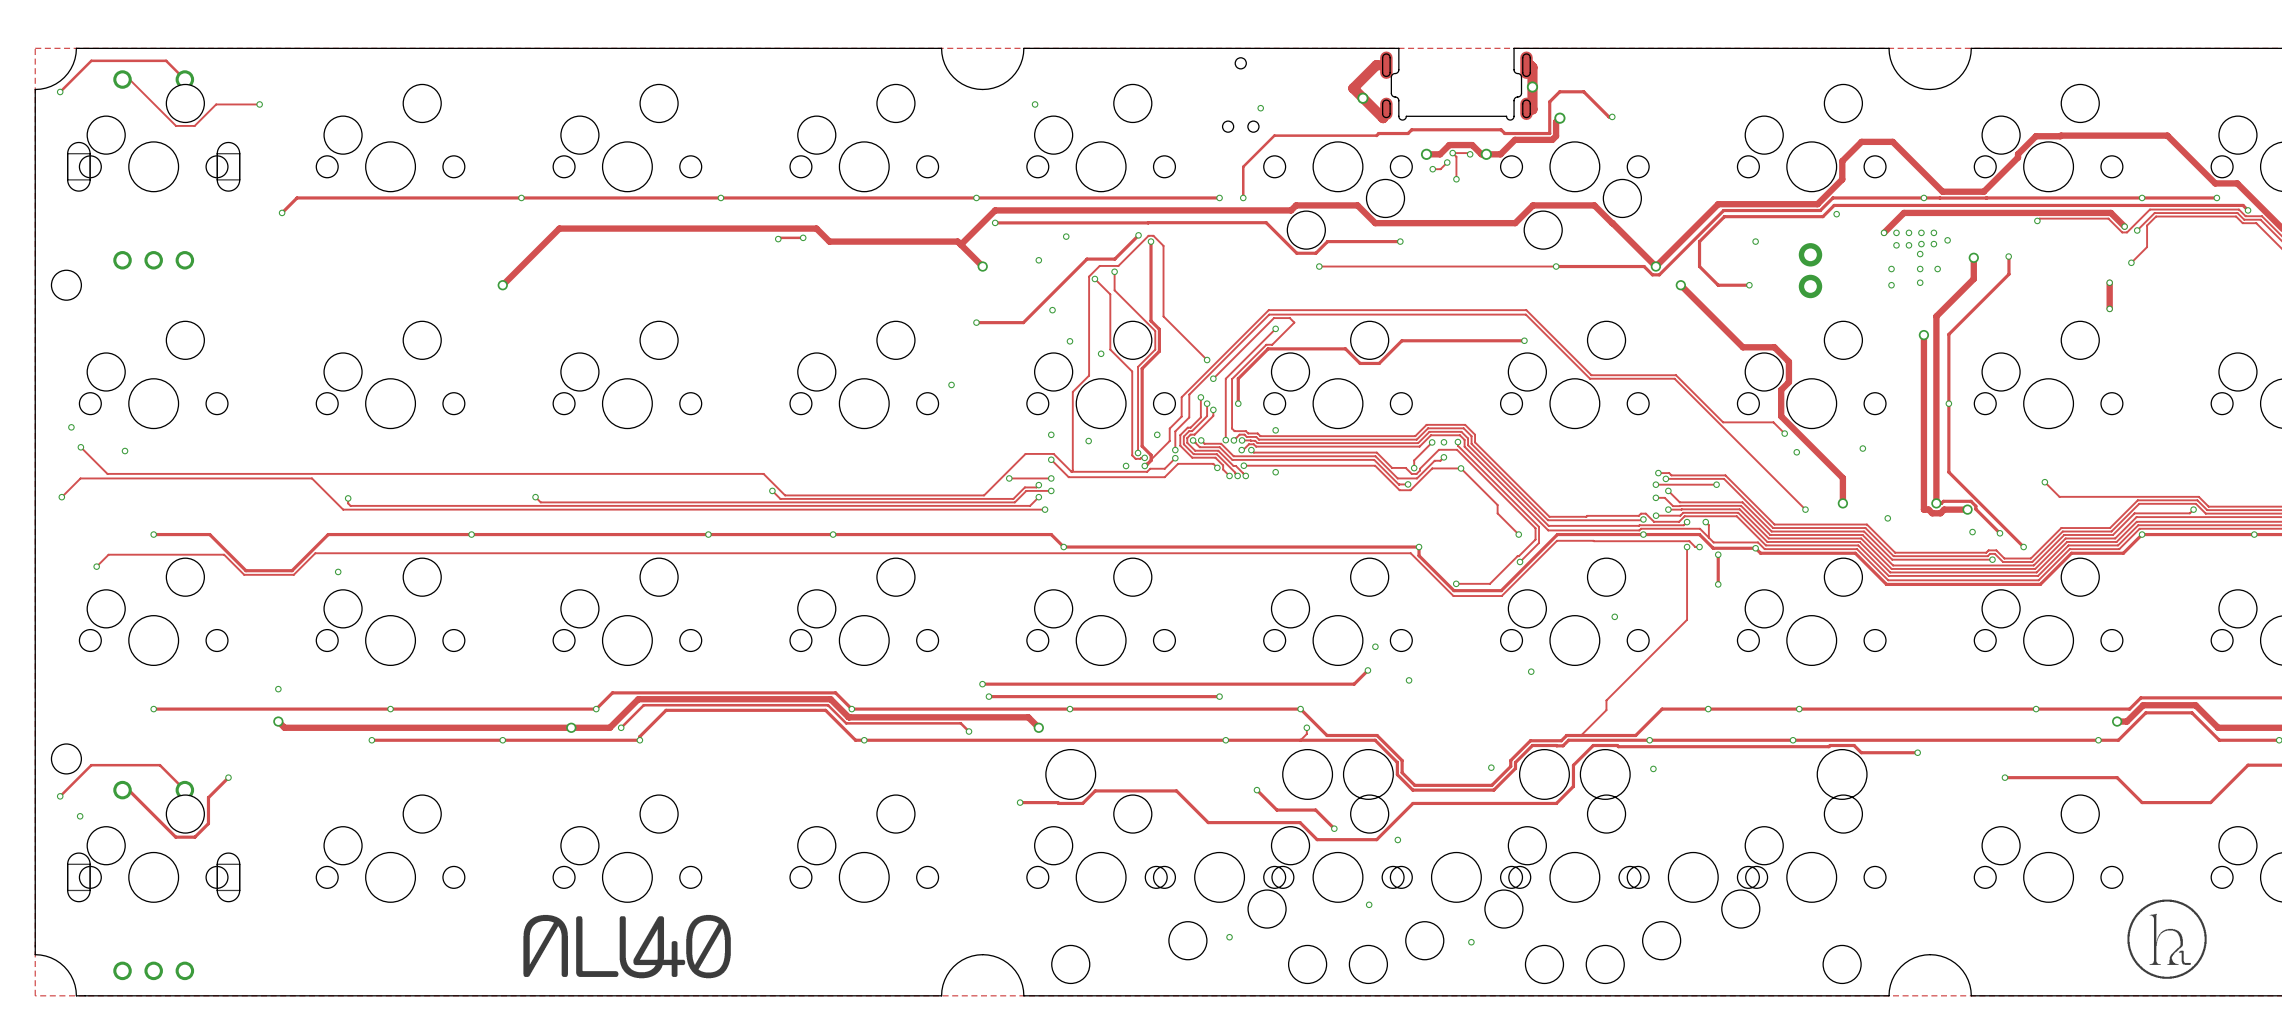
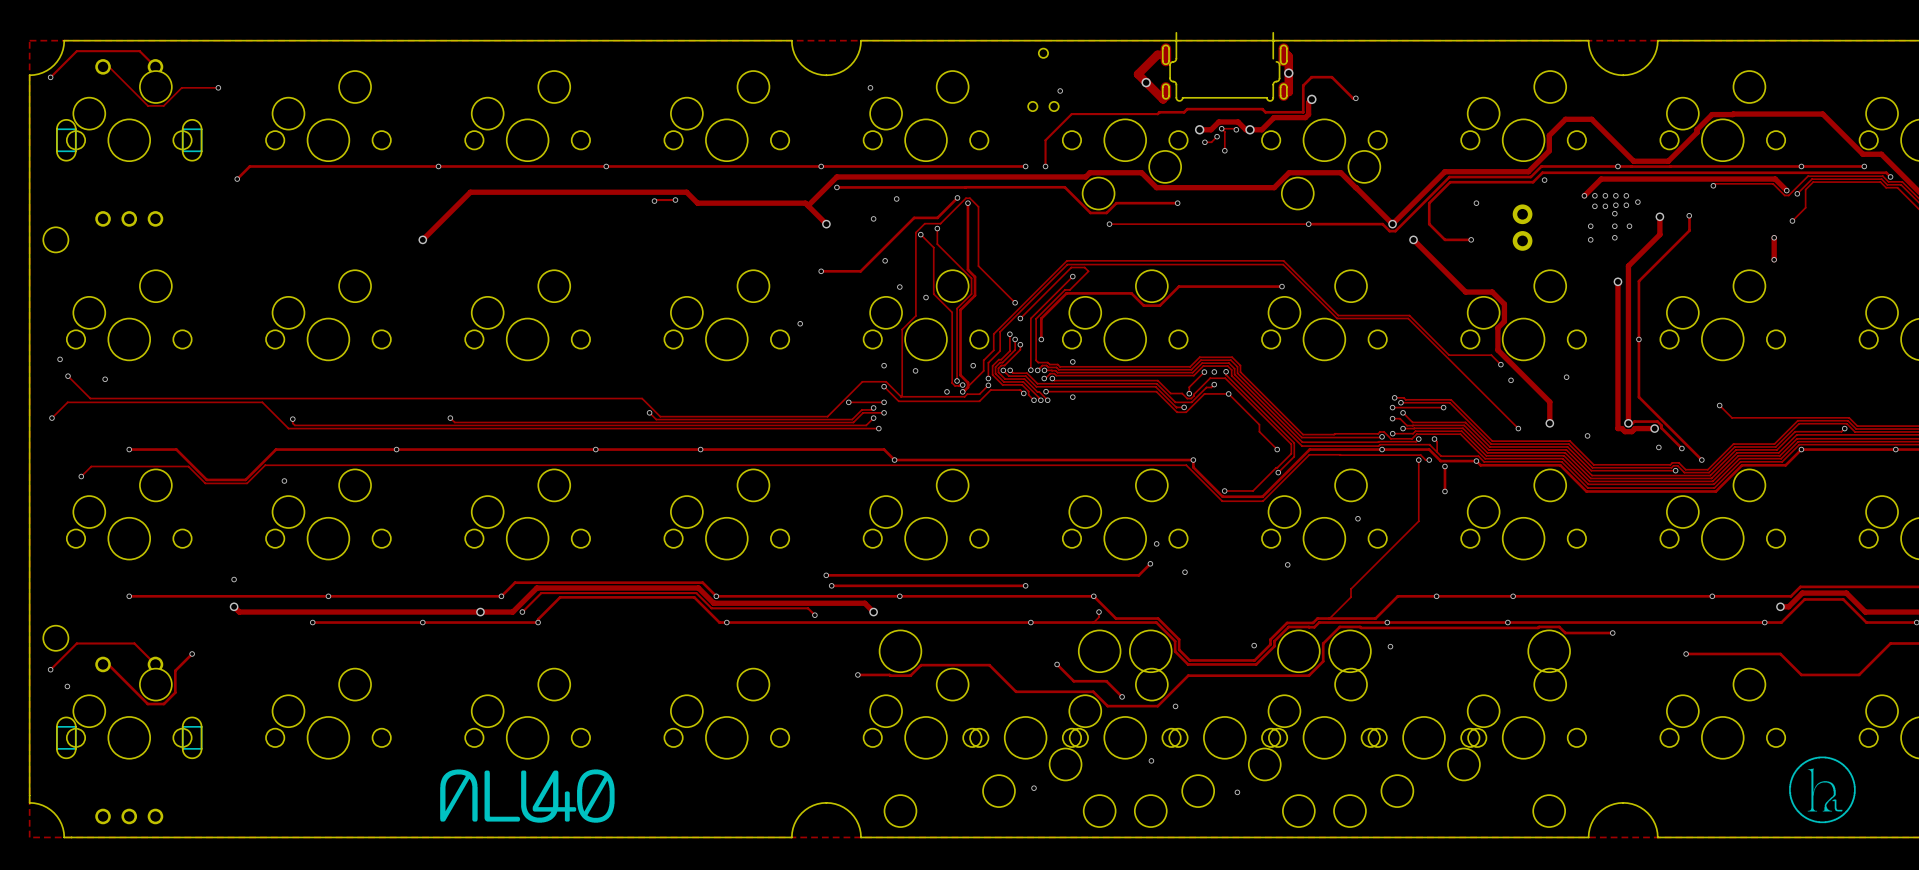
part footprint: [1380, 48, 1533, 121] -> [1160, 32, 1289, 101]
board edge: none -> (1176, 40) (1274, 40)

